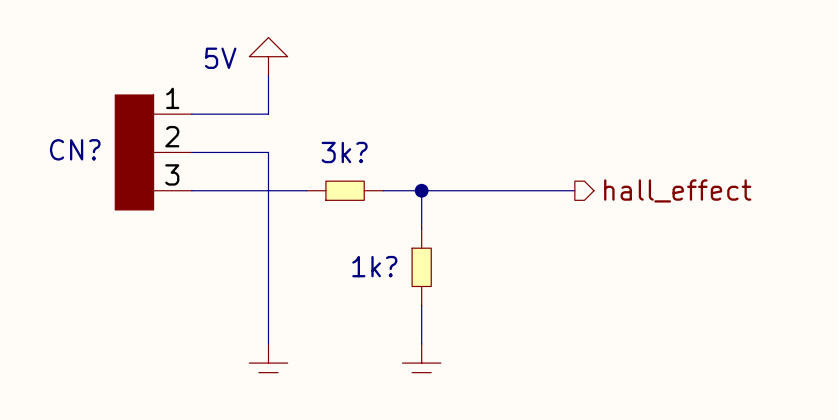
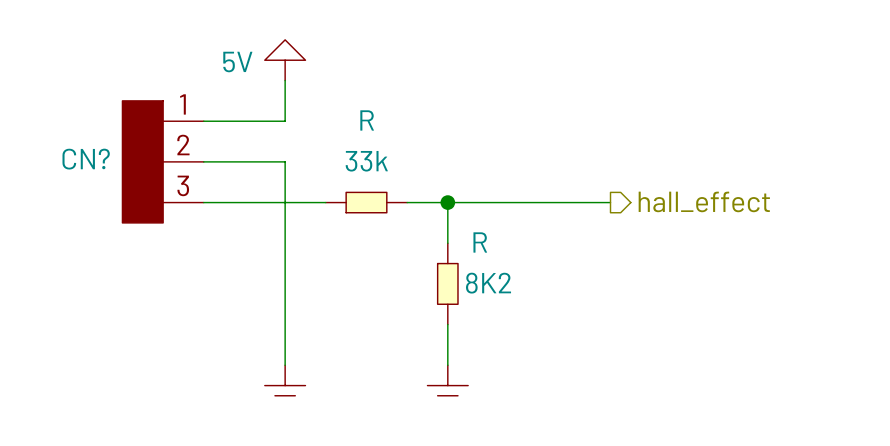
3k? value: none -> 33k (366, 161)
3k? name: 3k? (344, 152) -> R (367, 120)
1k? name: 1k? (374, 266) -> R (480, 242)
1k? value: none -> 8K2 (488, 283)

